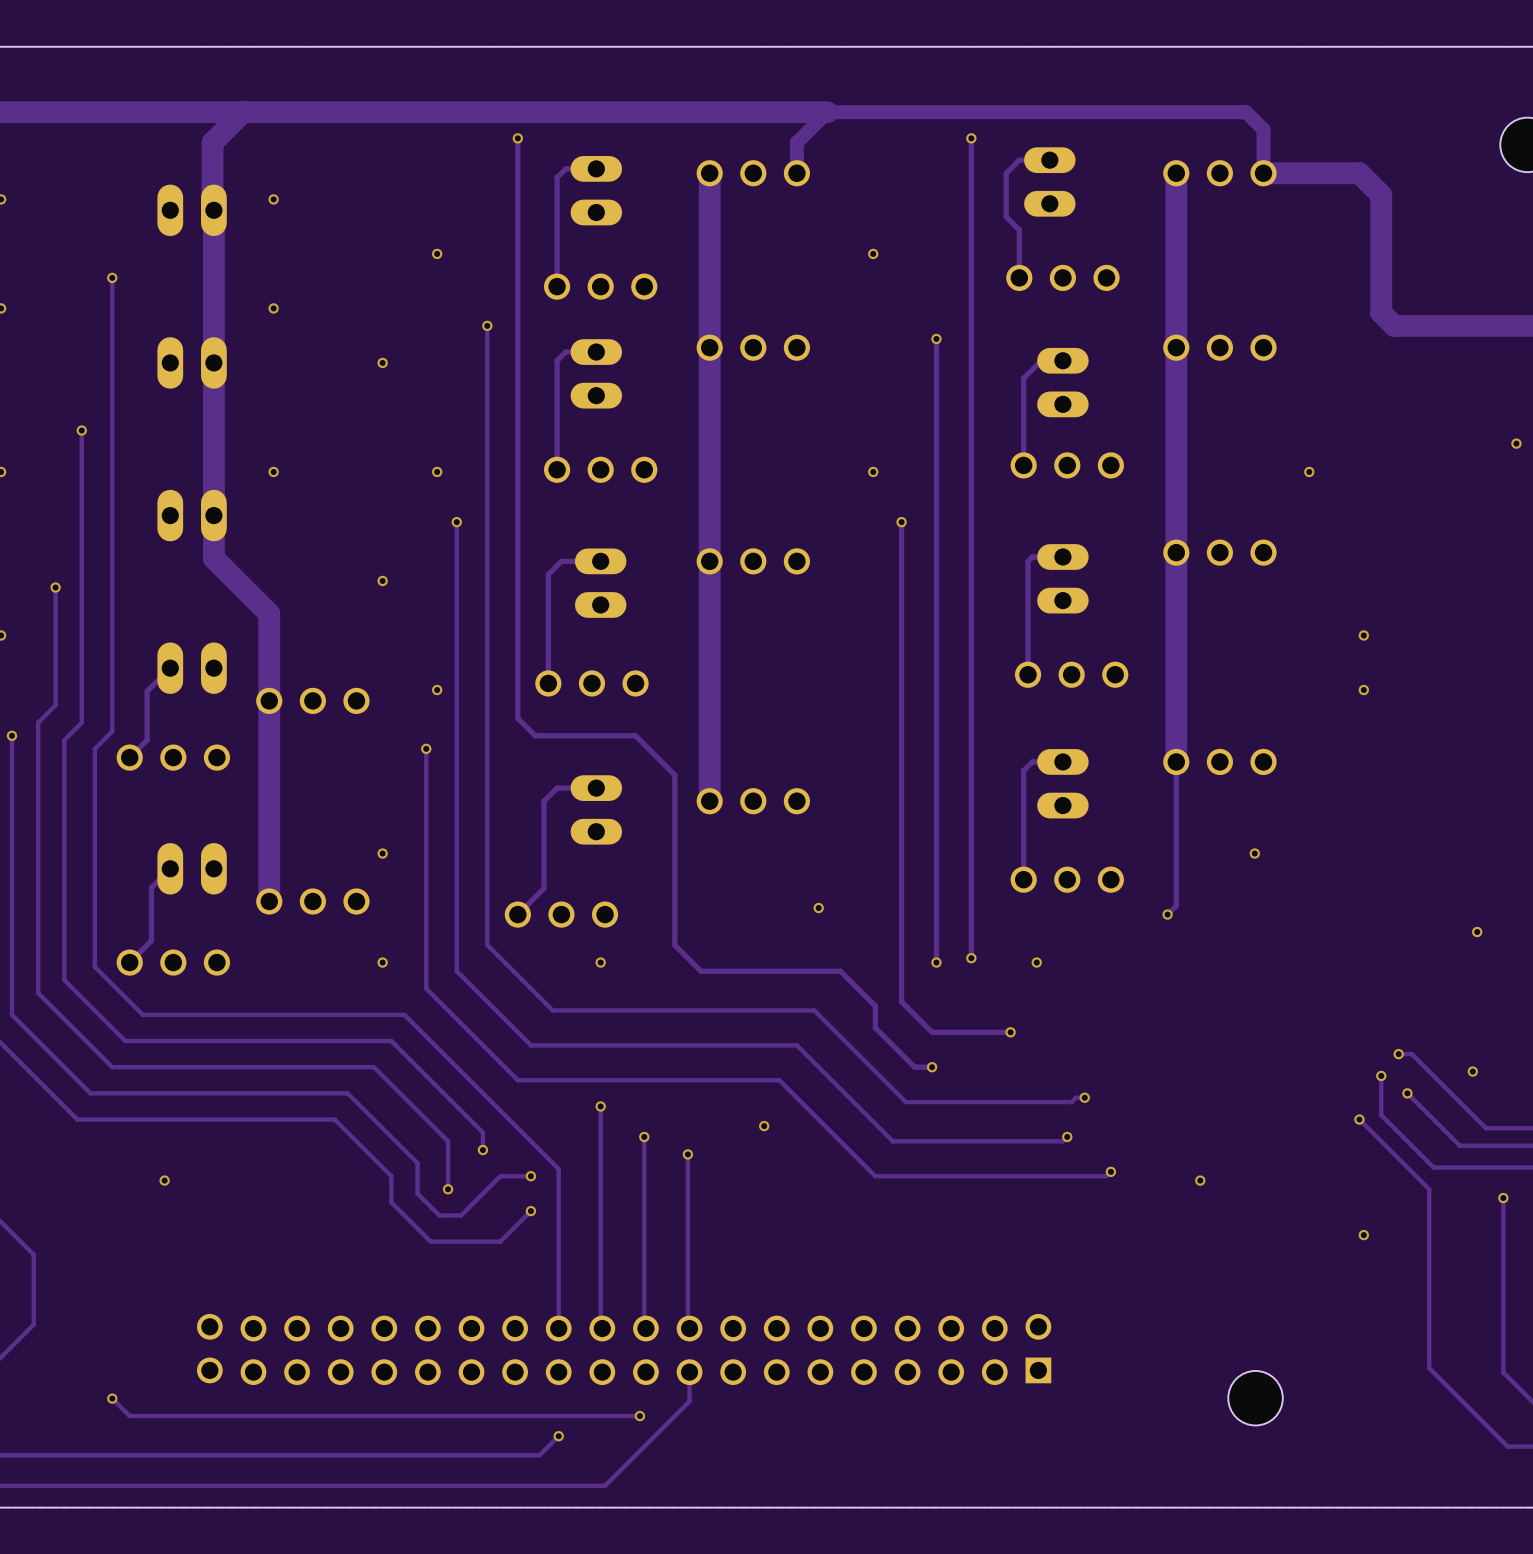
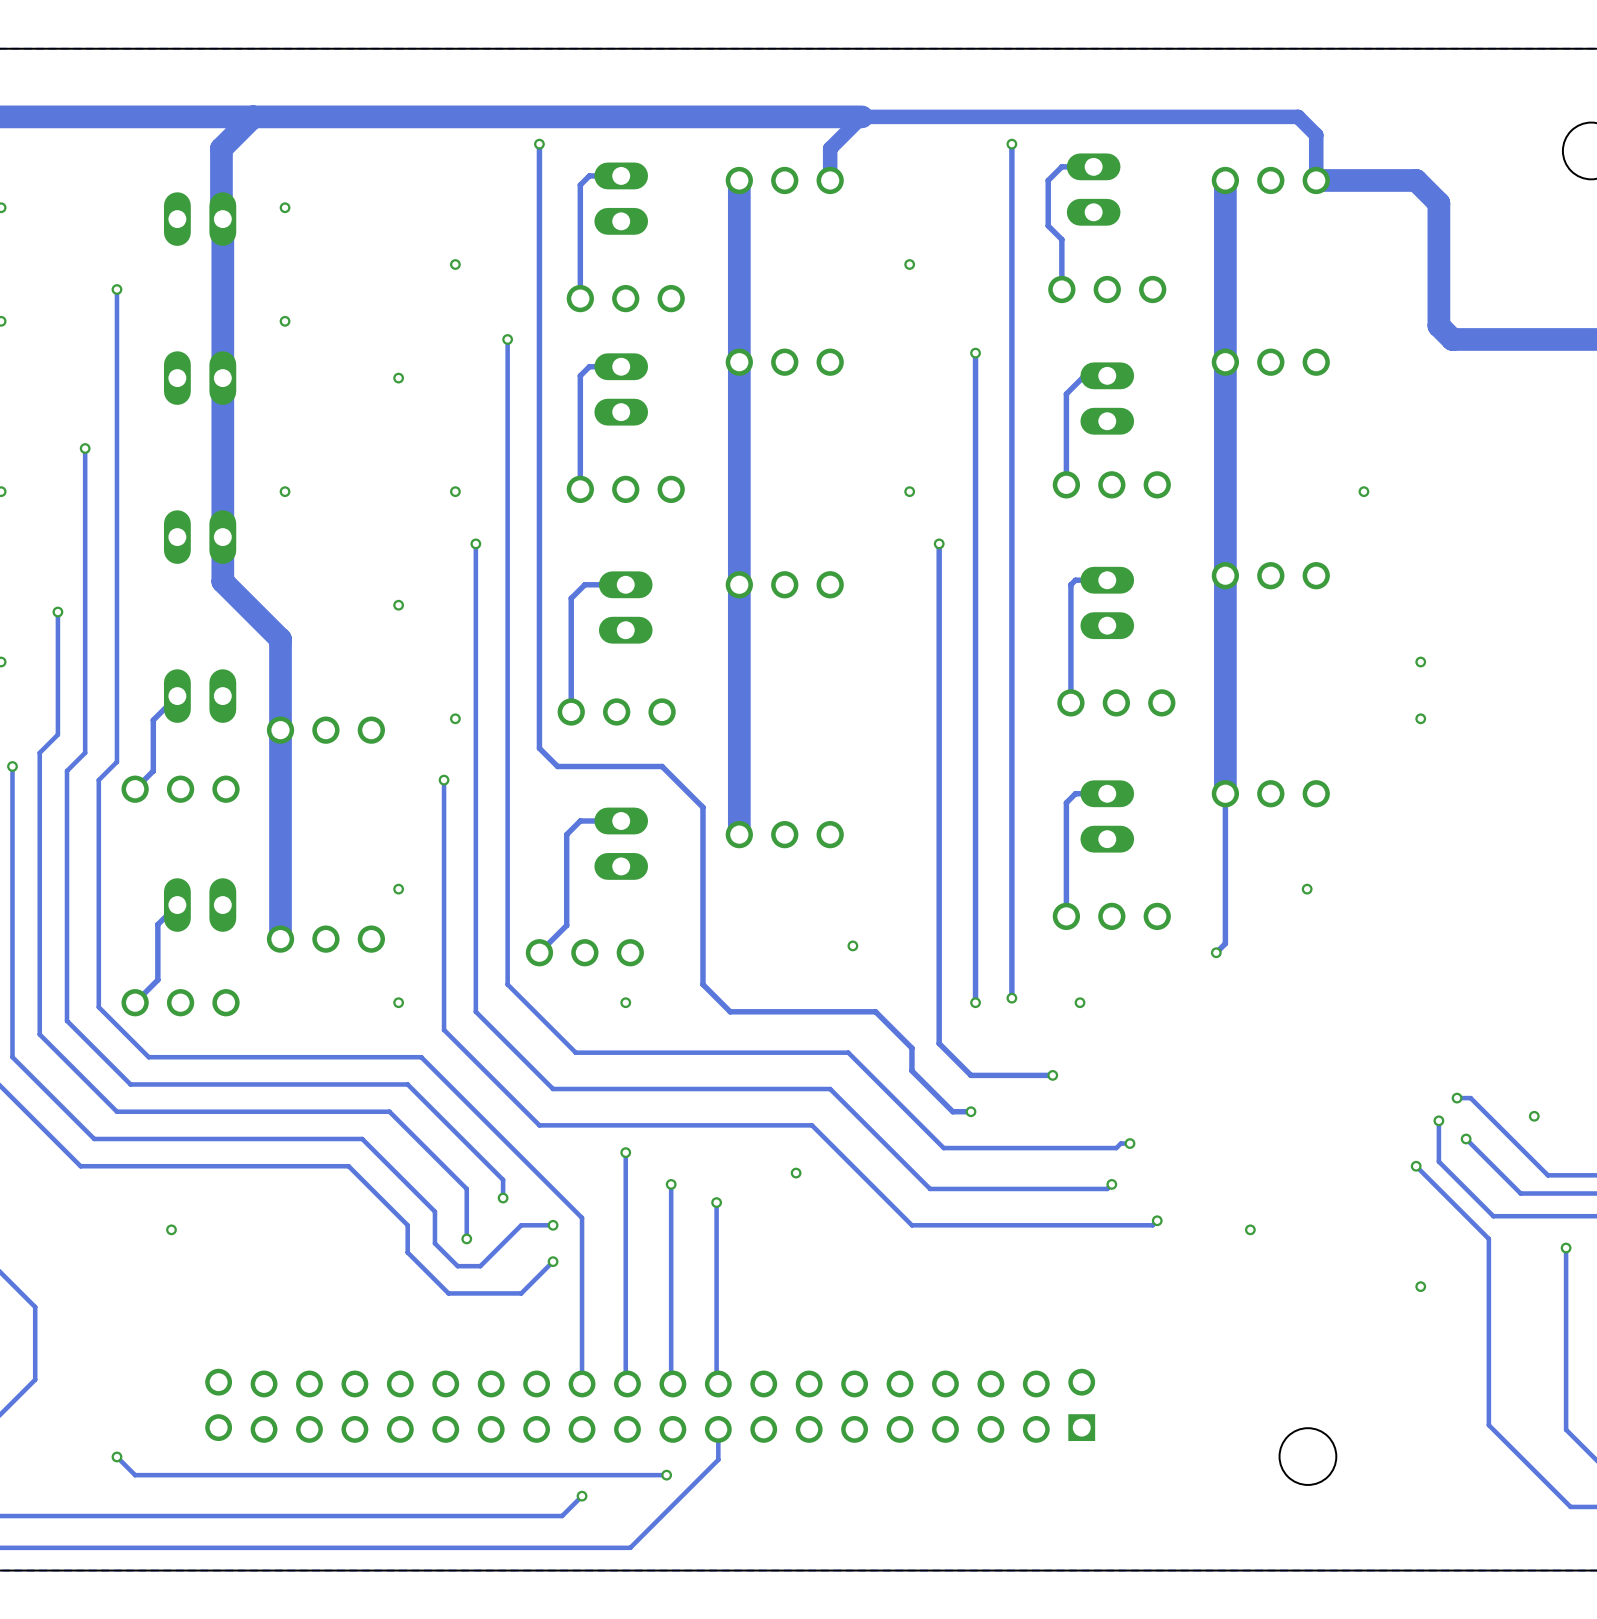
via: (1516, 443) -> none
via: (1477, 932) -> none

